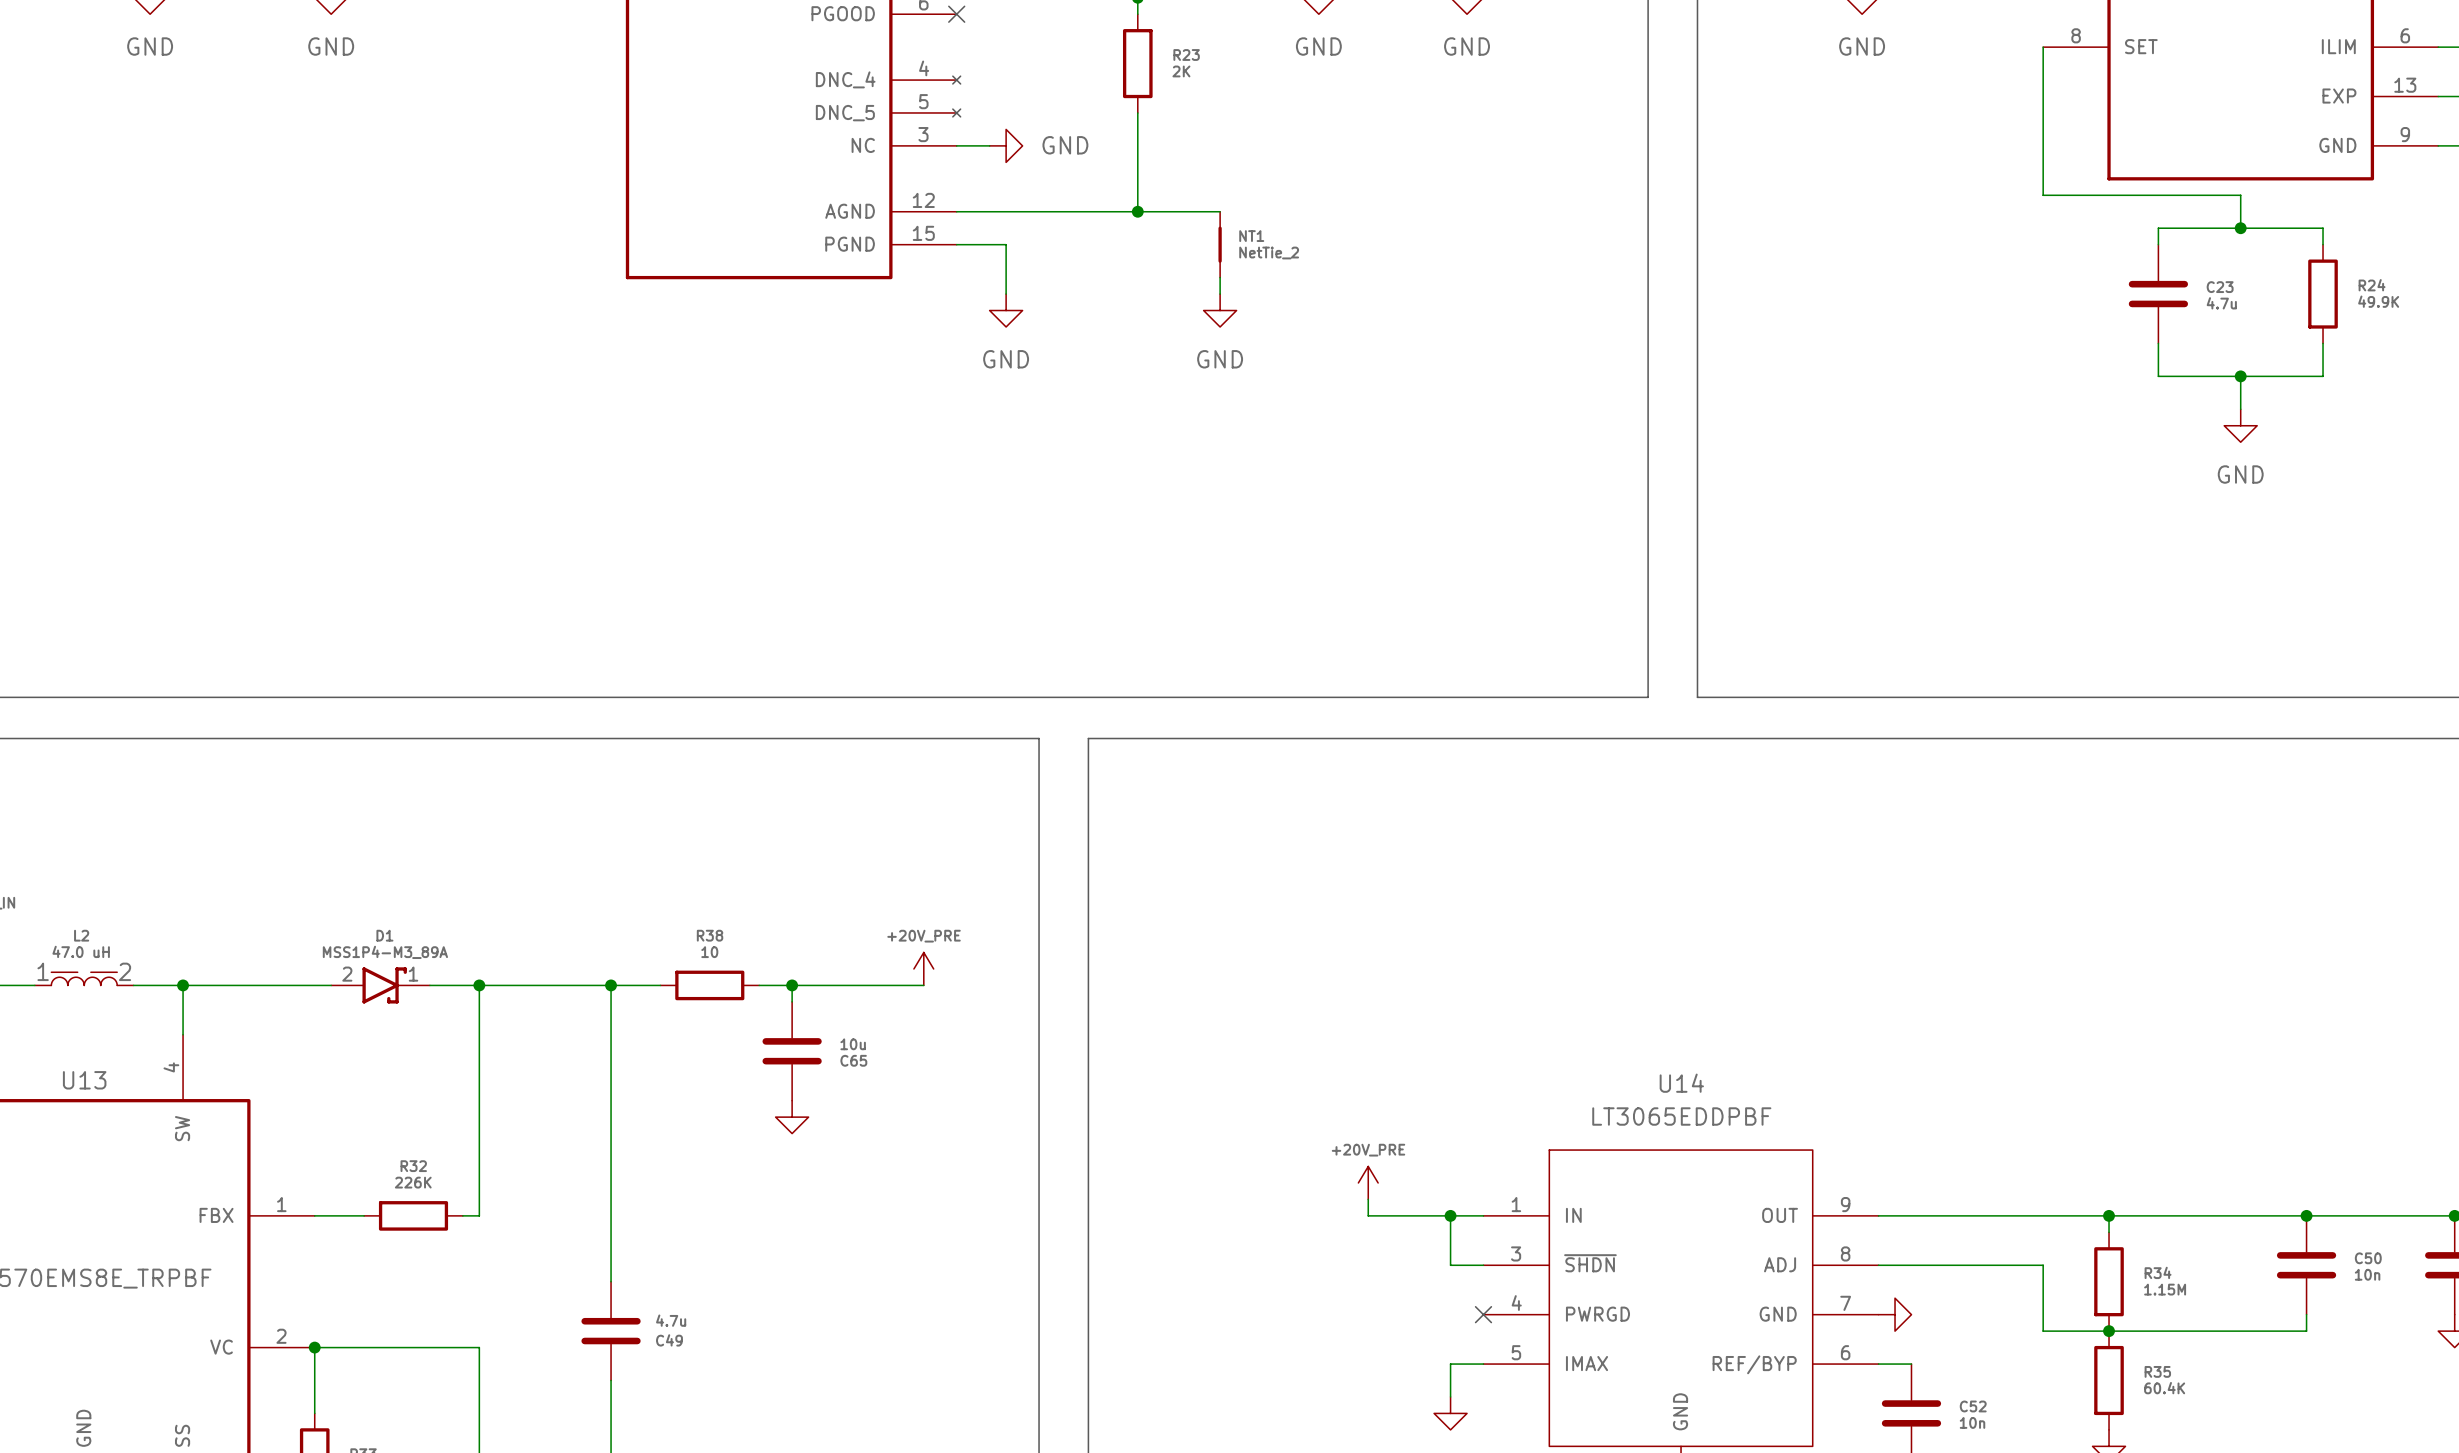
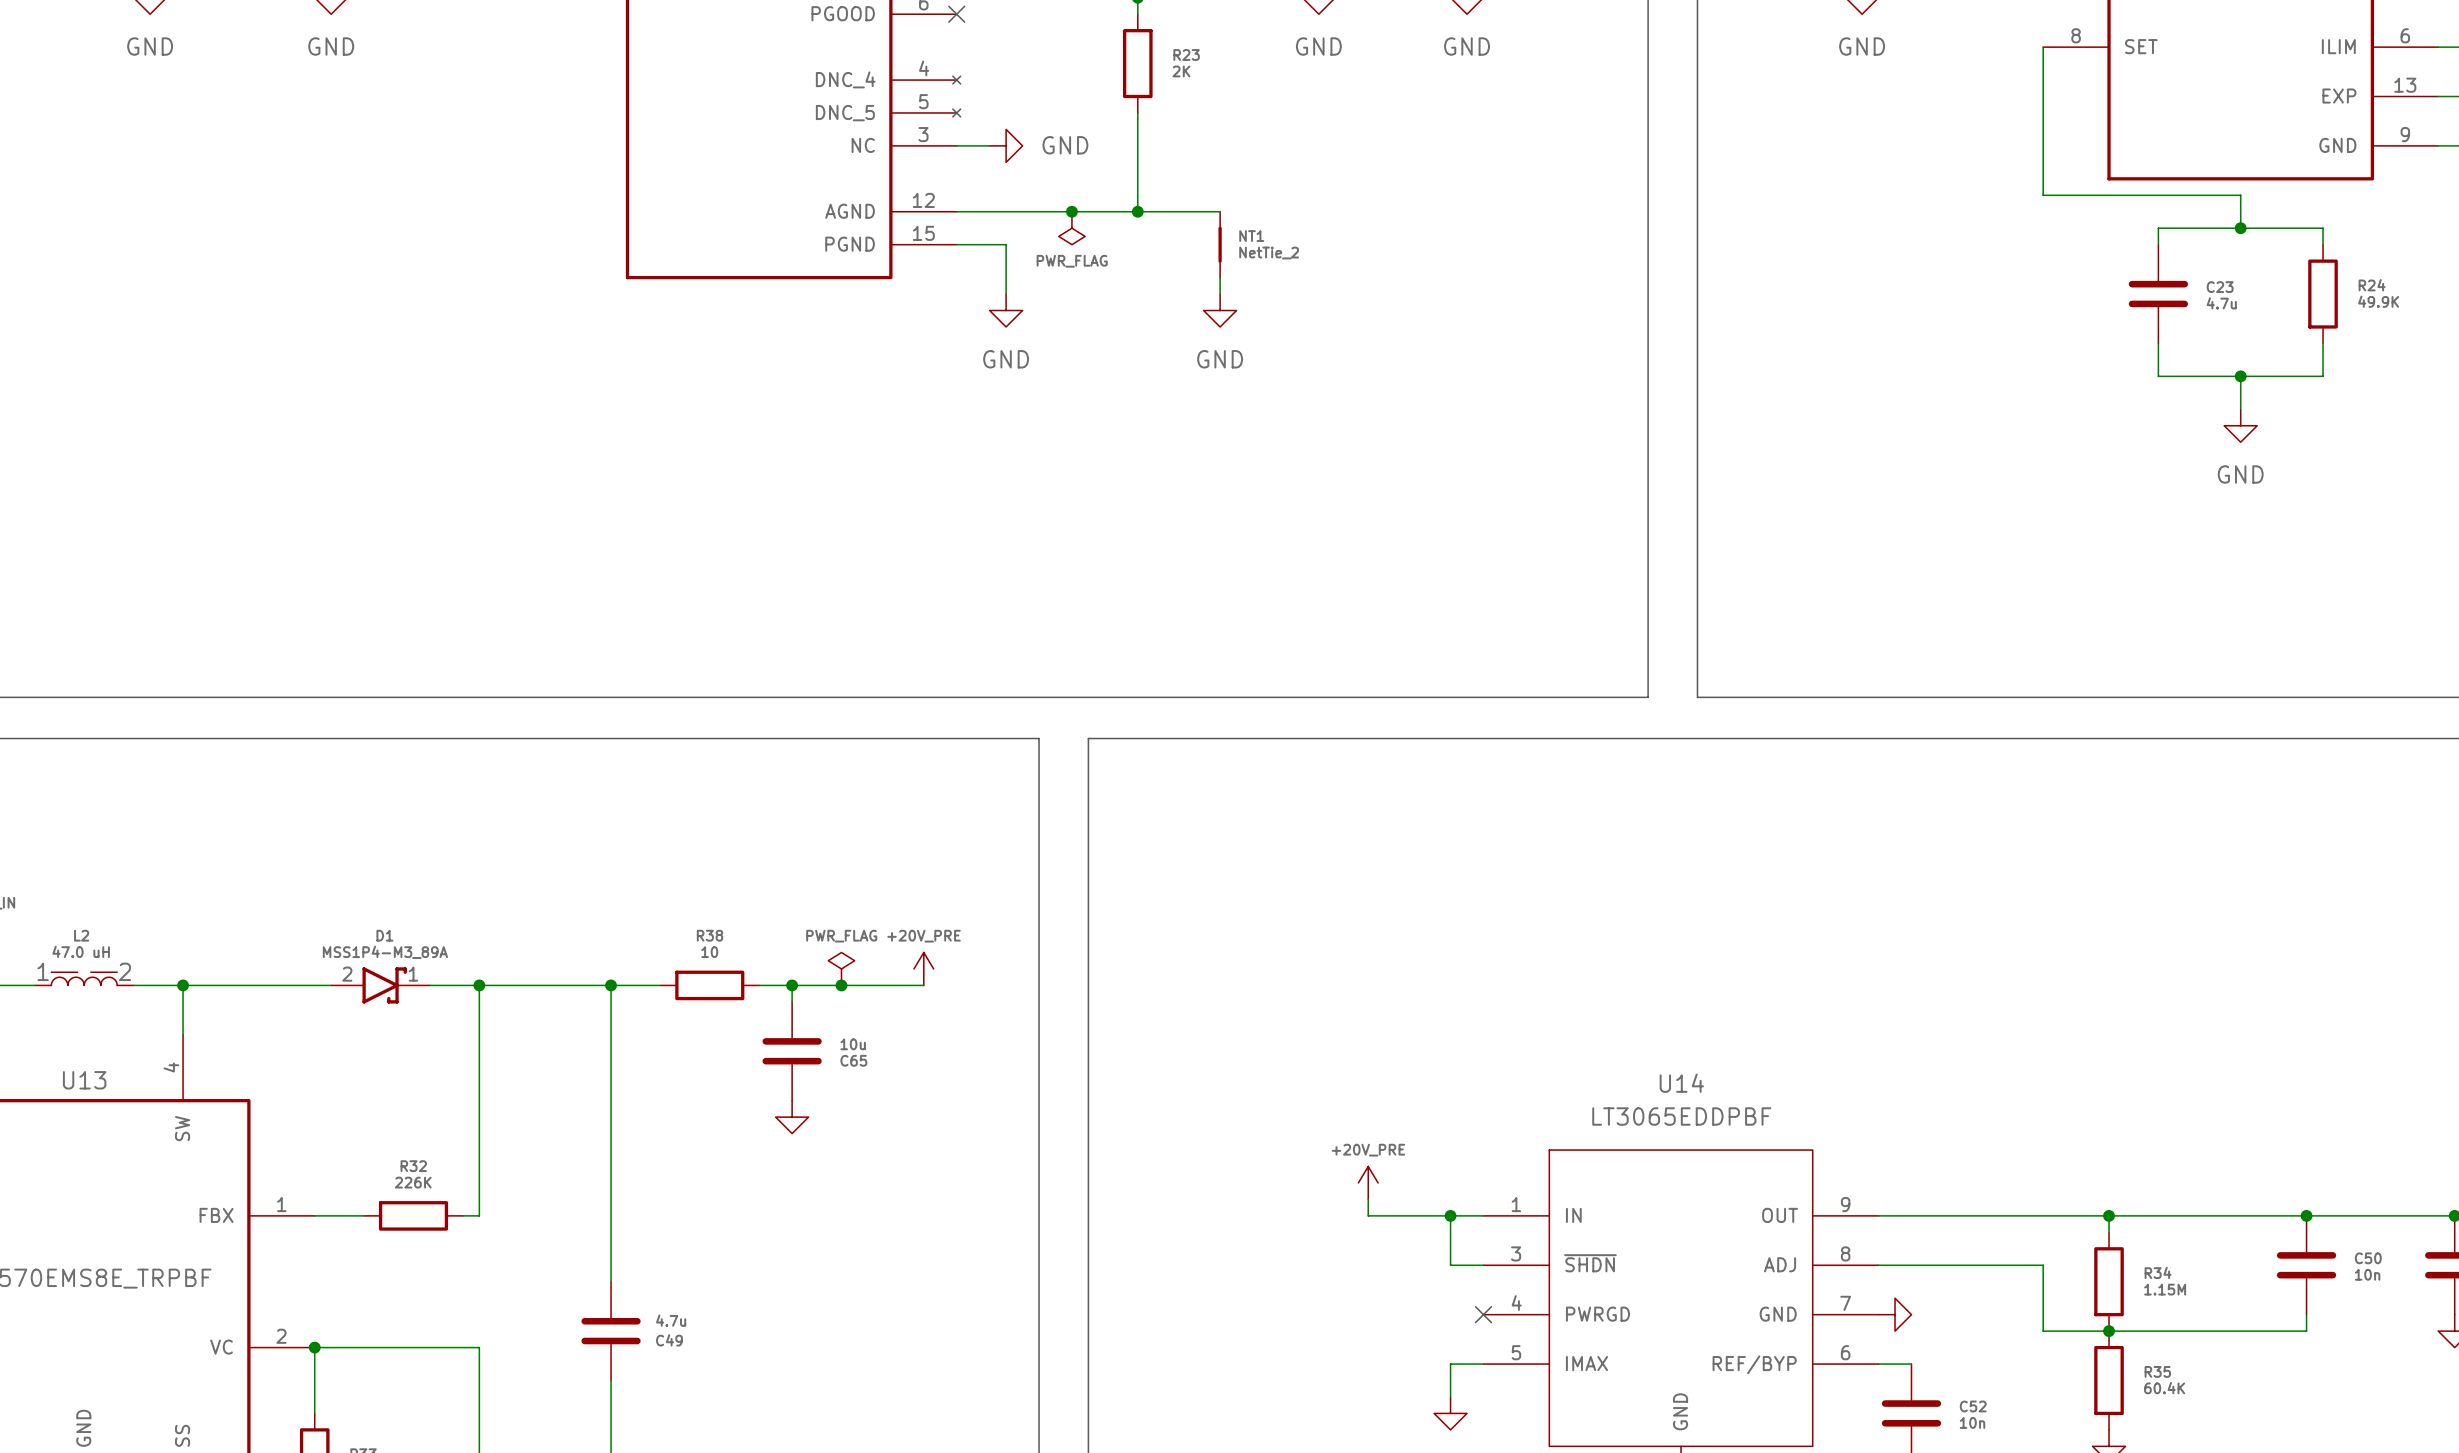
junction: none -> (1071, 211)
power symbol: none -> PWR_FLAG (1071, 228)
power symbol: none -> PWR_FLAG (841, 968)
junction: none -> (841, 985)

